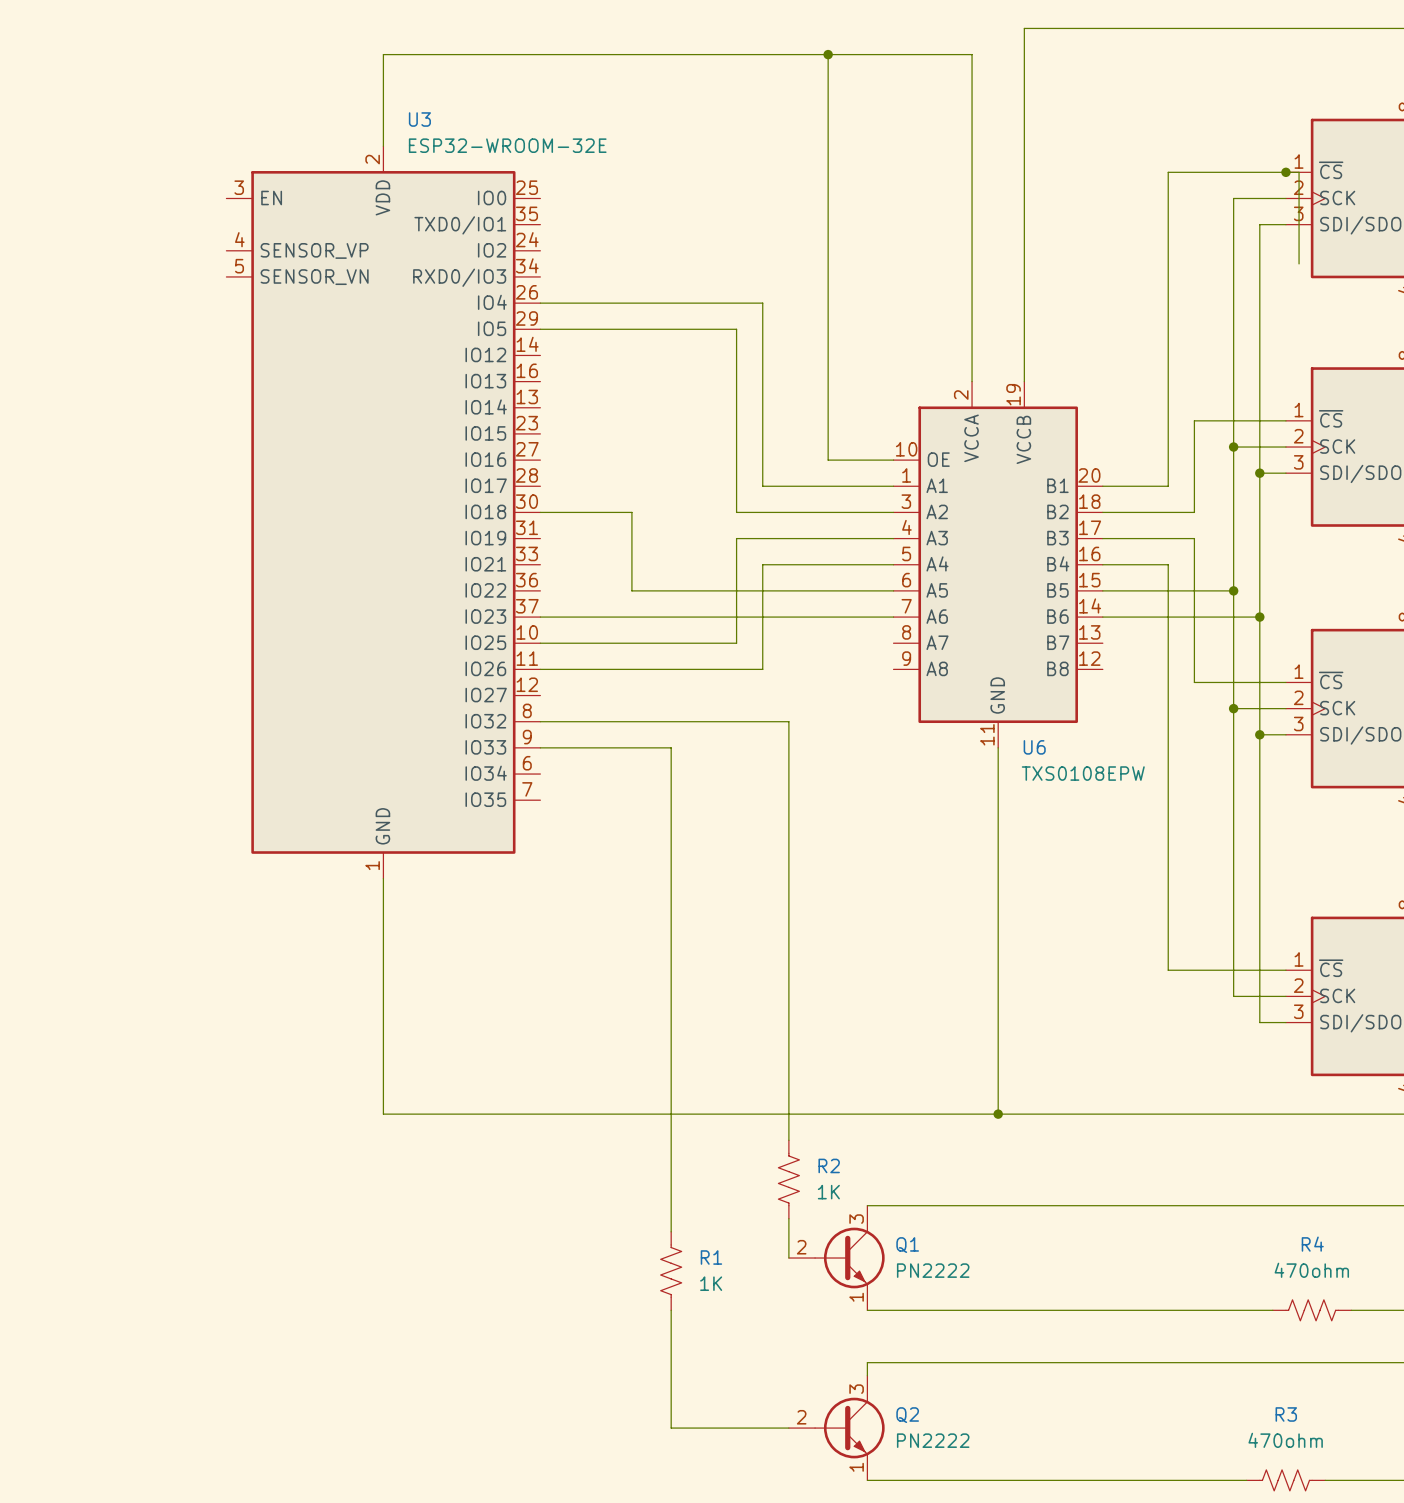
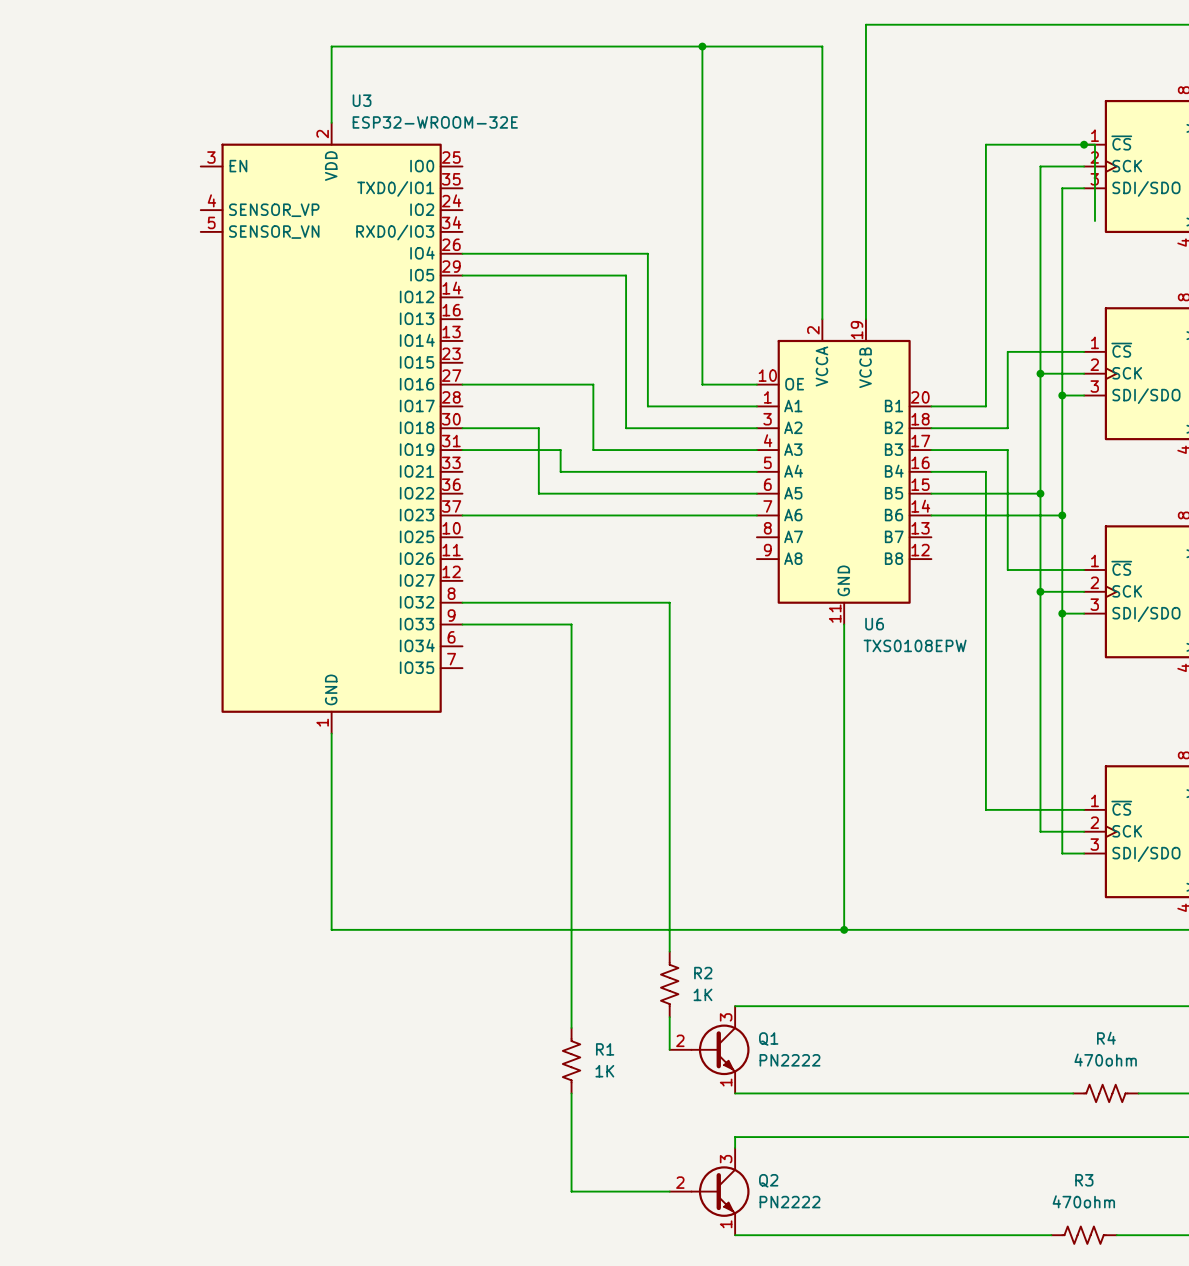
wire: (736, 538) (736, 643) (540, 643) -> (626, 450) (593, 450) (593, 384) (462, 384)
wire: (762, 564) (762, 669) (540, 669) -> (647, 471) (560, 471) (560, 450) (462, 450)

